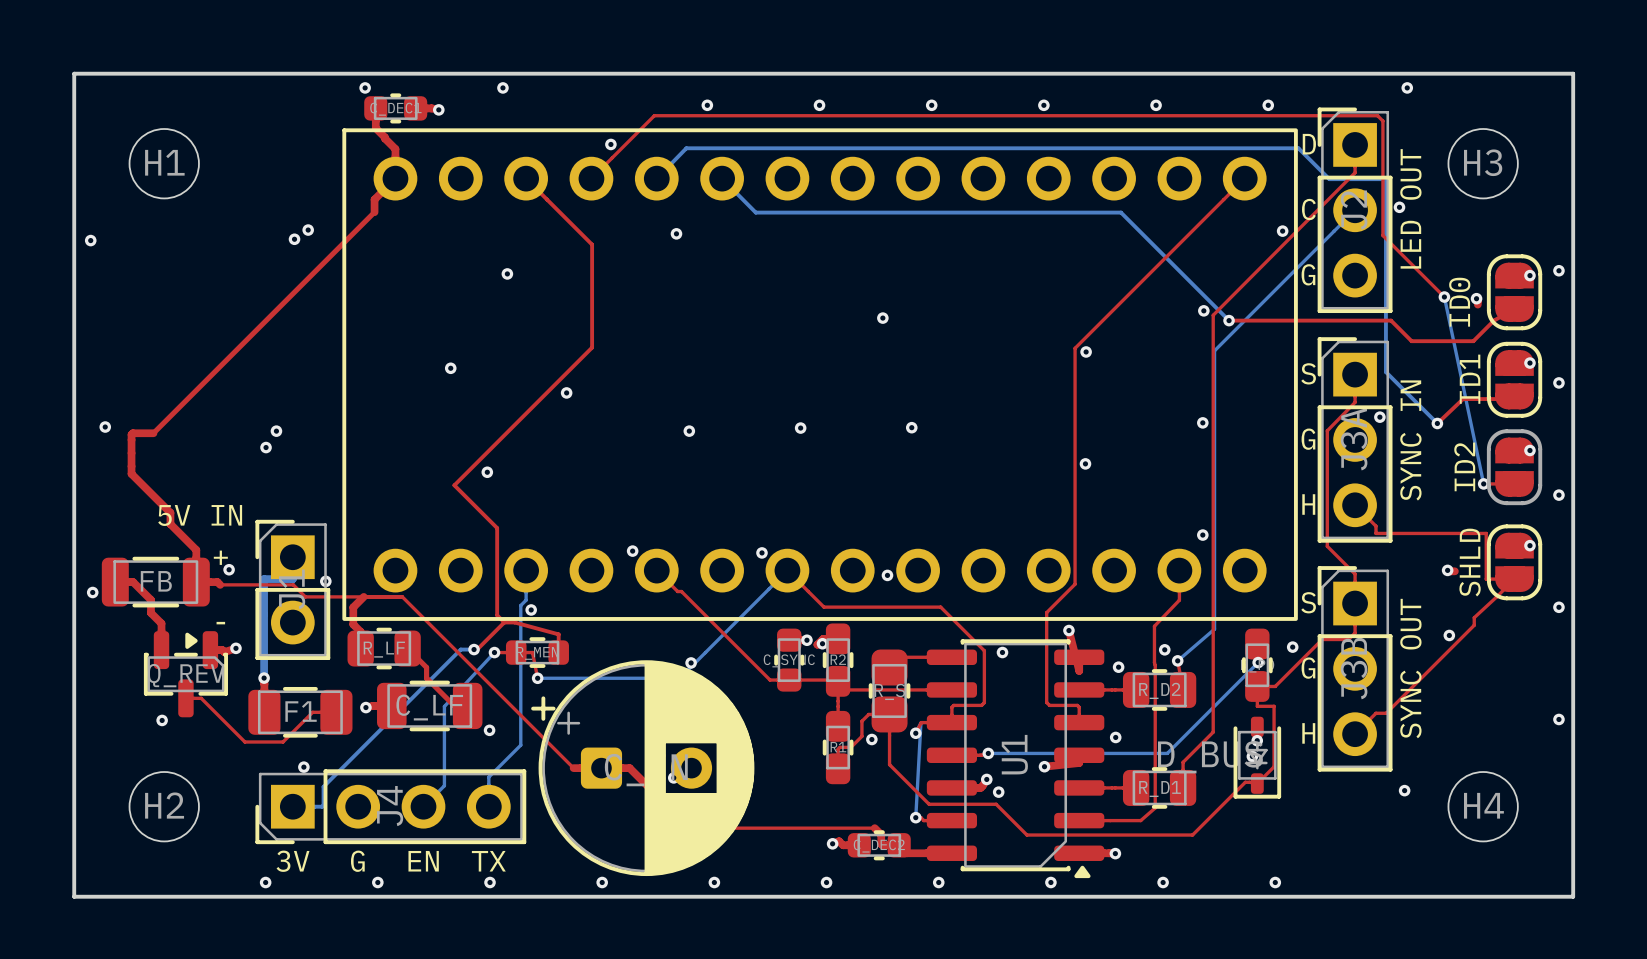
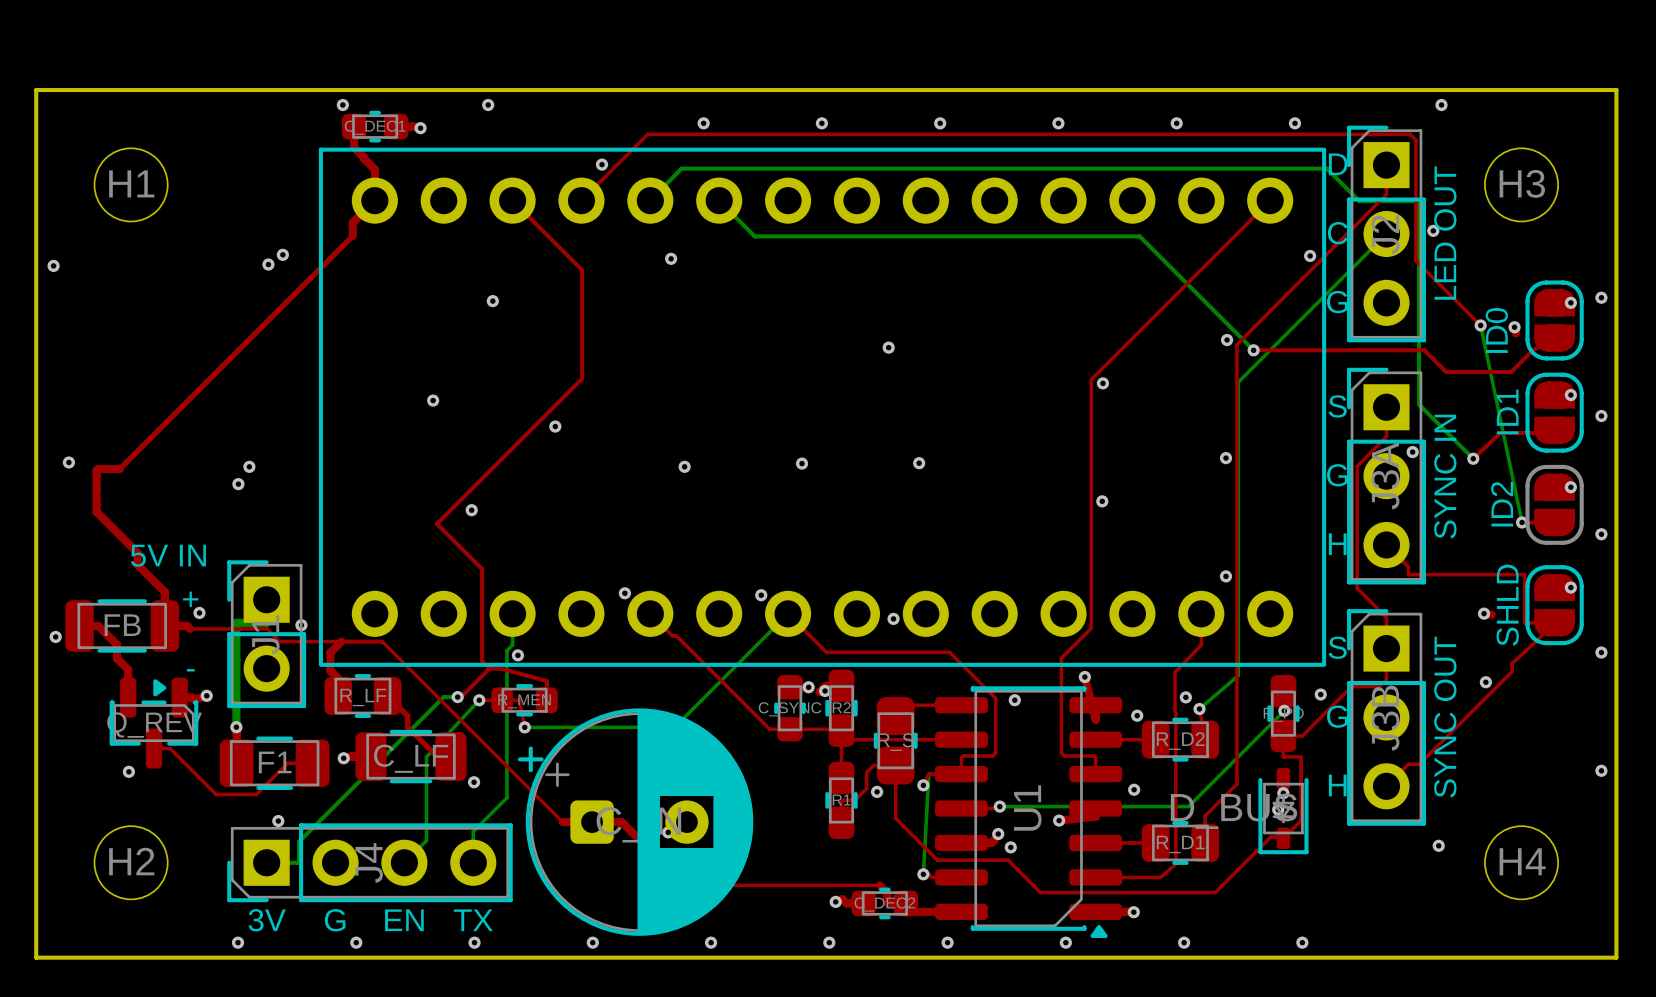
via: (691, 662) -> none

